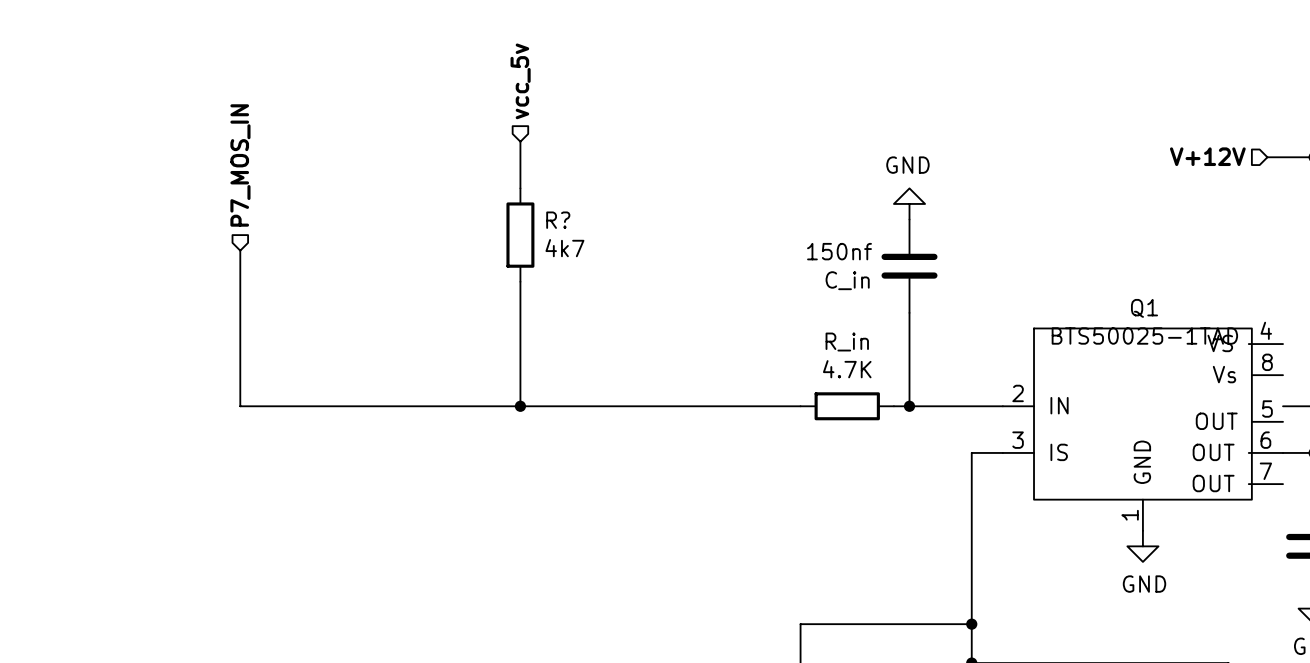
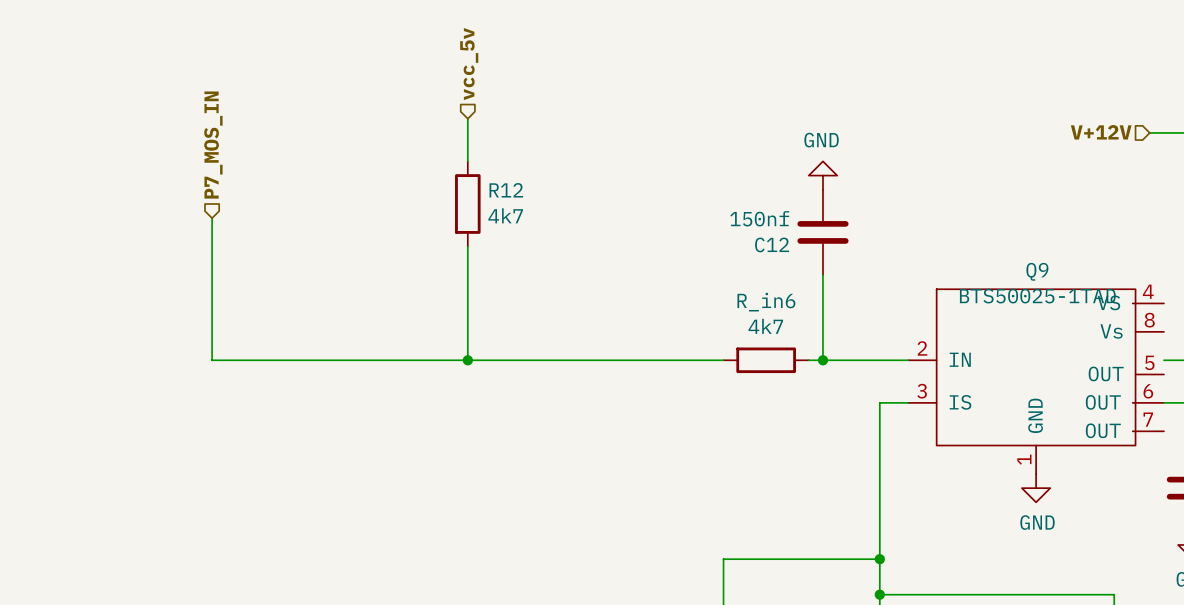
R? name: R? (558, 220) -> R12 (506, 190)
C_in name: C_in (847, 280) -> C12 (772, 244)
Q1 name: Q1 (1144, 308) -> Q9 (1037, 271)
R_in name: R_in (847, 342) -> R_in6 (766, 302)
R_in value: 4.7K (847, 369) -> 4k7 (765, 326)

